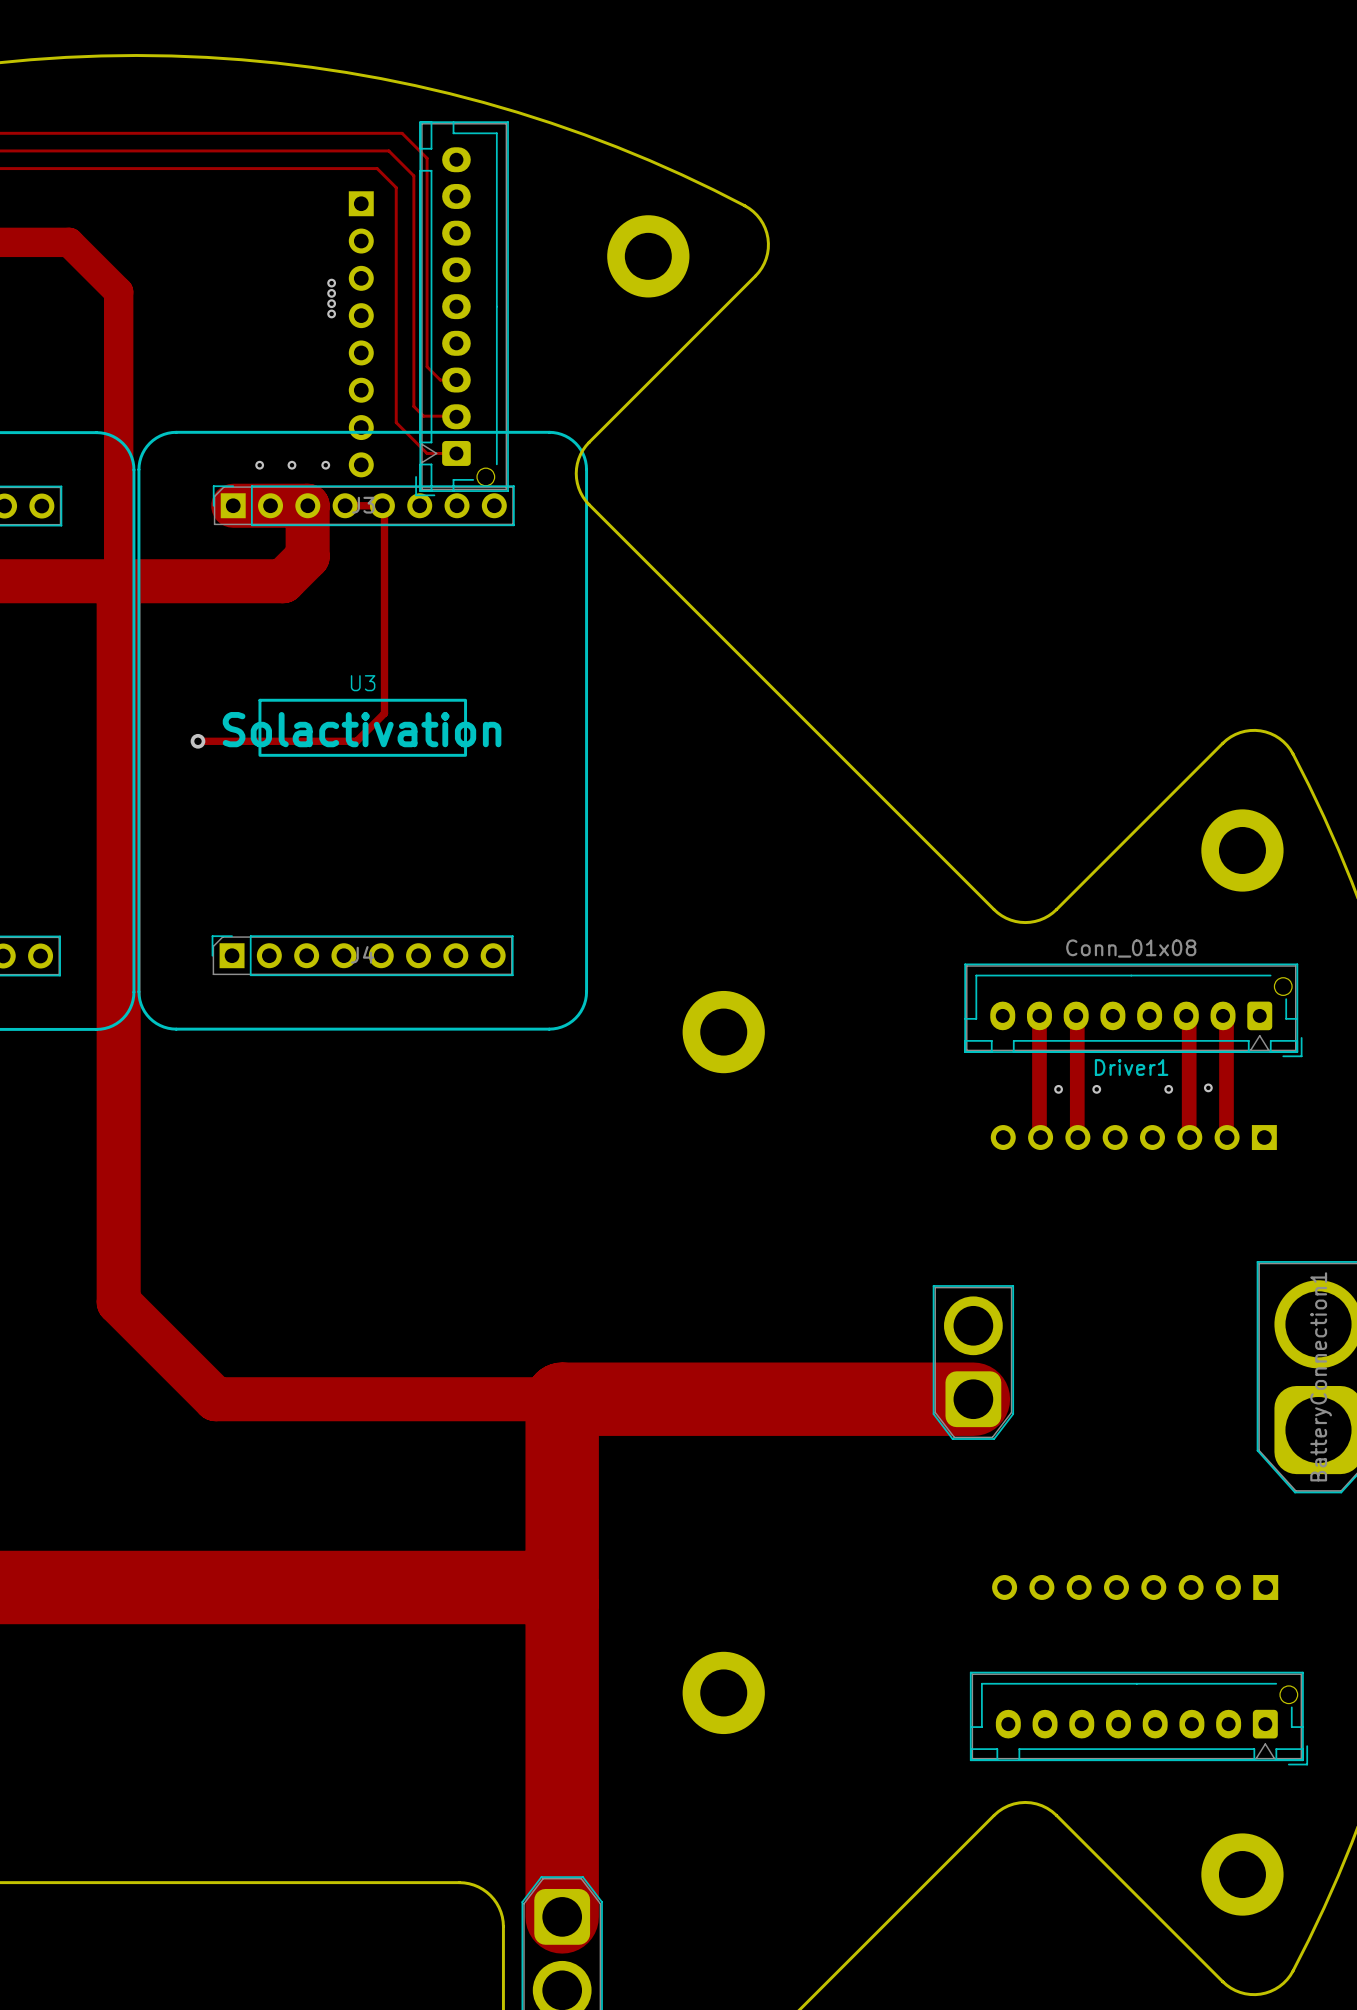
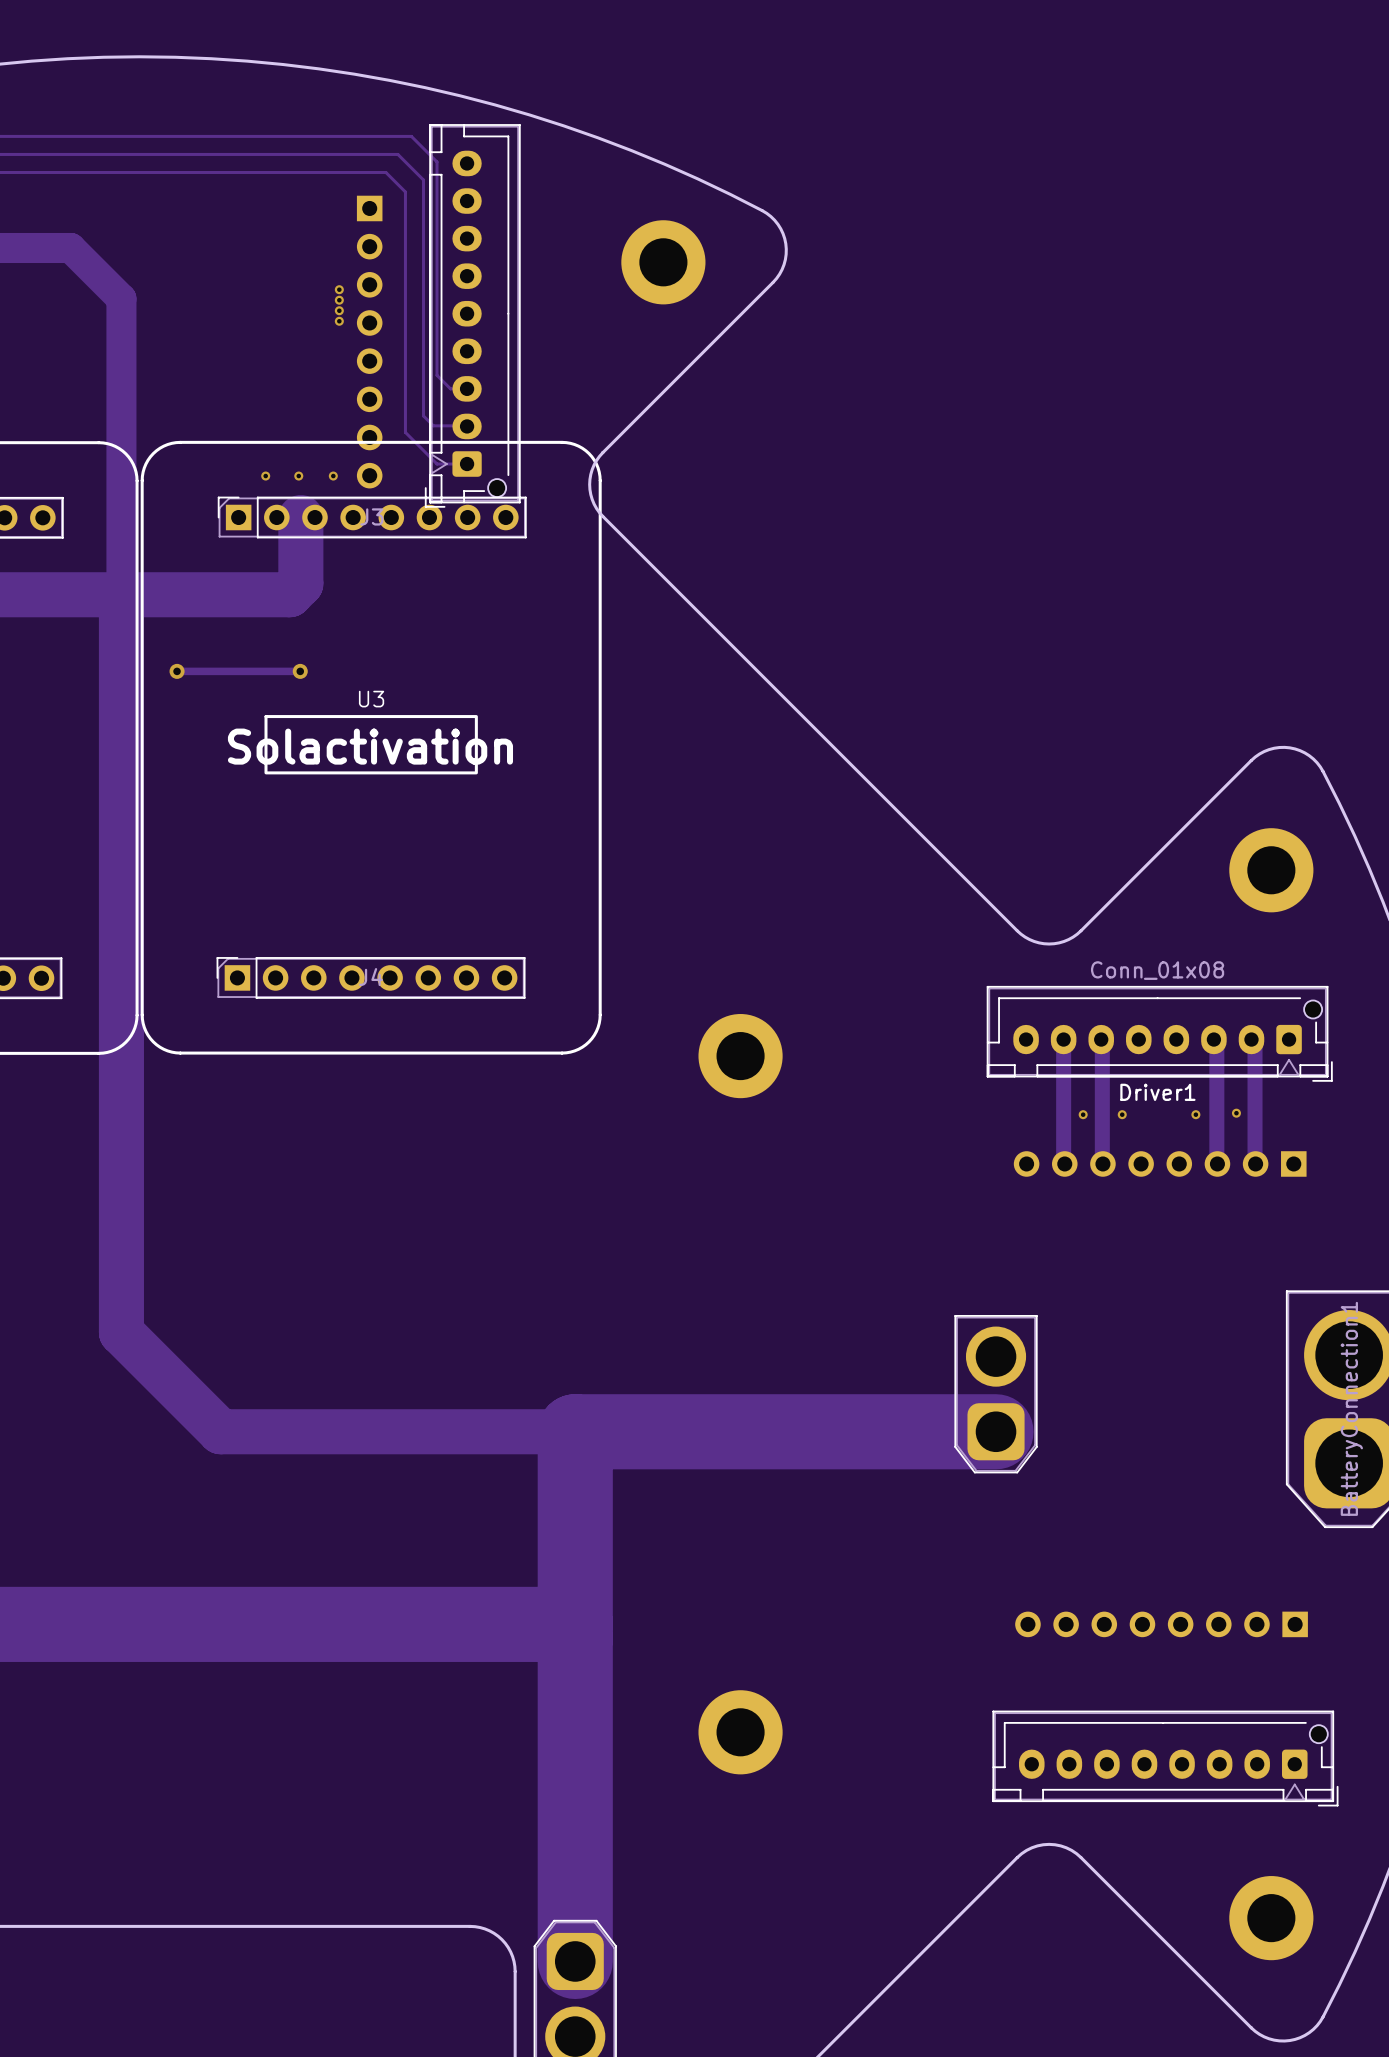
track: (233, 505) (307, 505) (307, 556) (294, 570) -> (300, 517) (300, 583)
track: (345, 505) (382, 505) (384, 507) (384, 713) (356, 741) (197, 741) -> none
track: none -> (175, 671) (300, 671)
via: none -> (177, 671)
via: none -> (300, 671)
via: (197, 741) -> none

